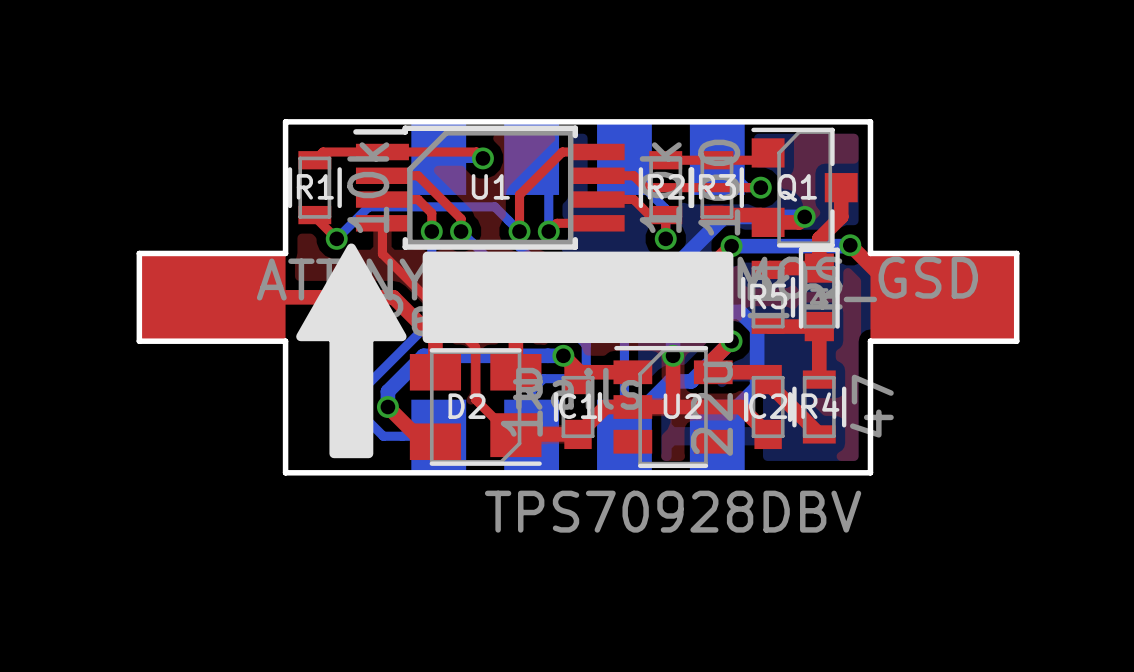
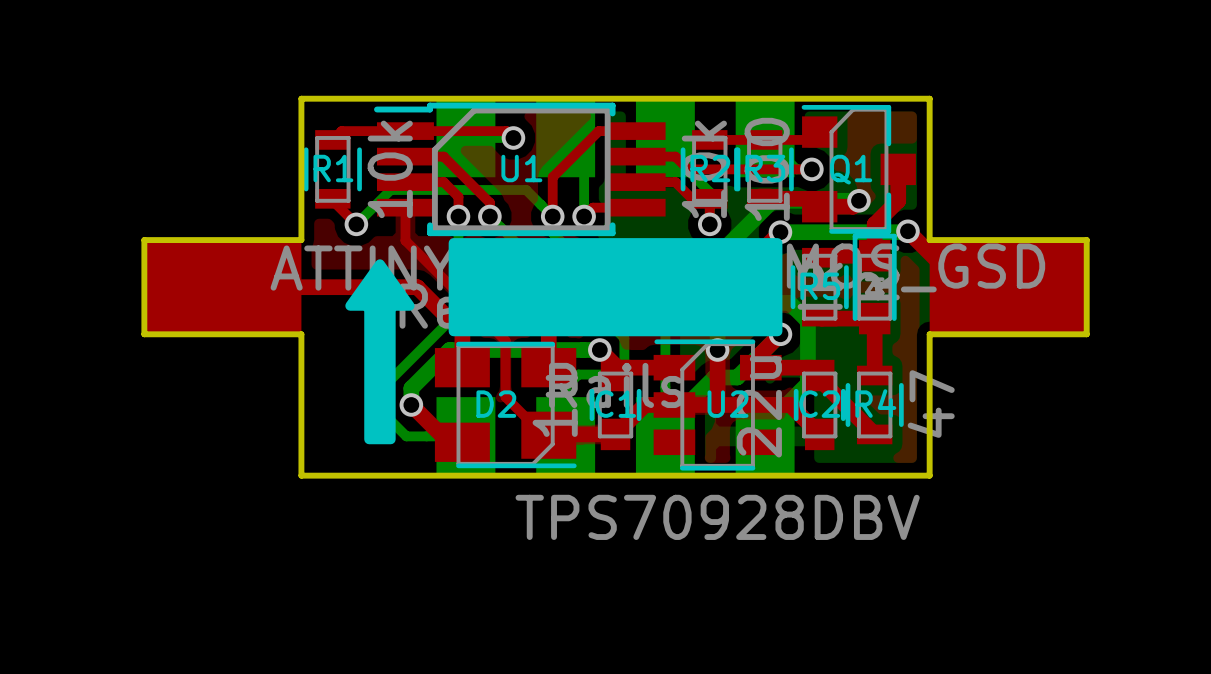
drawing shape: [296, 243, 407, 459] -> [345, 259, 415, 445]

